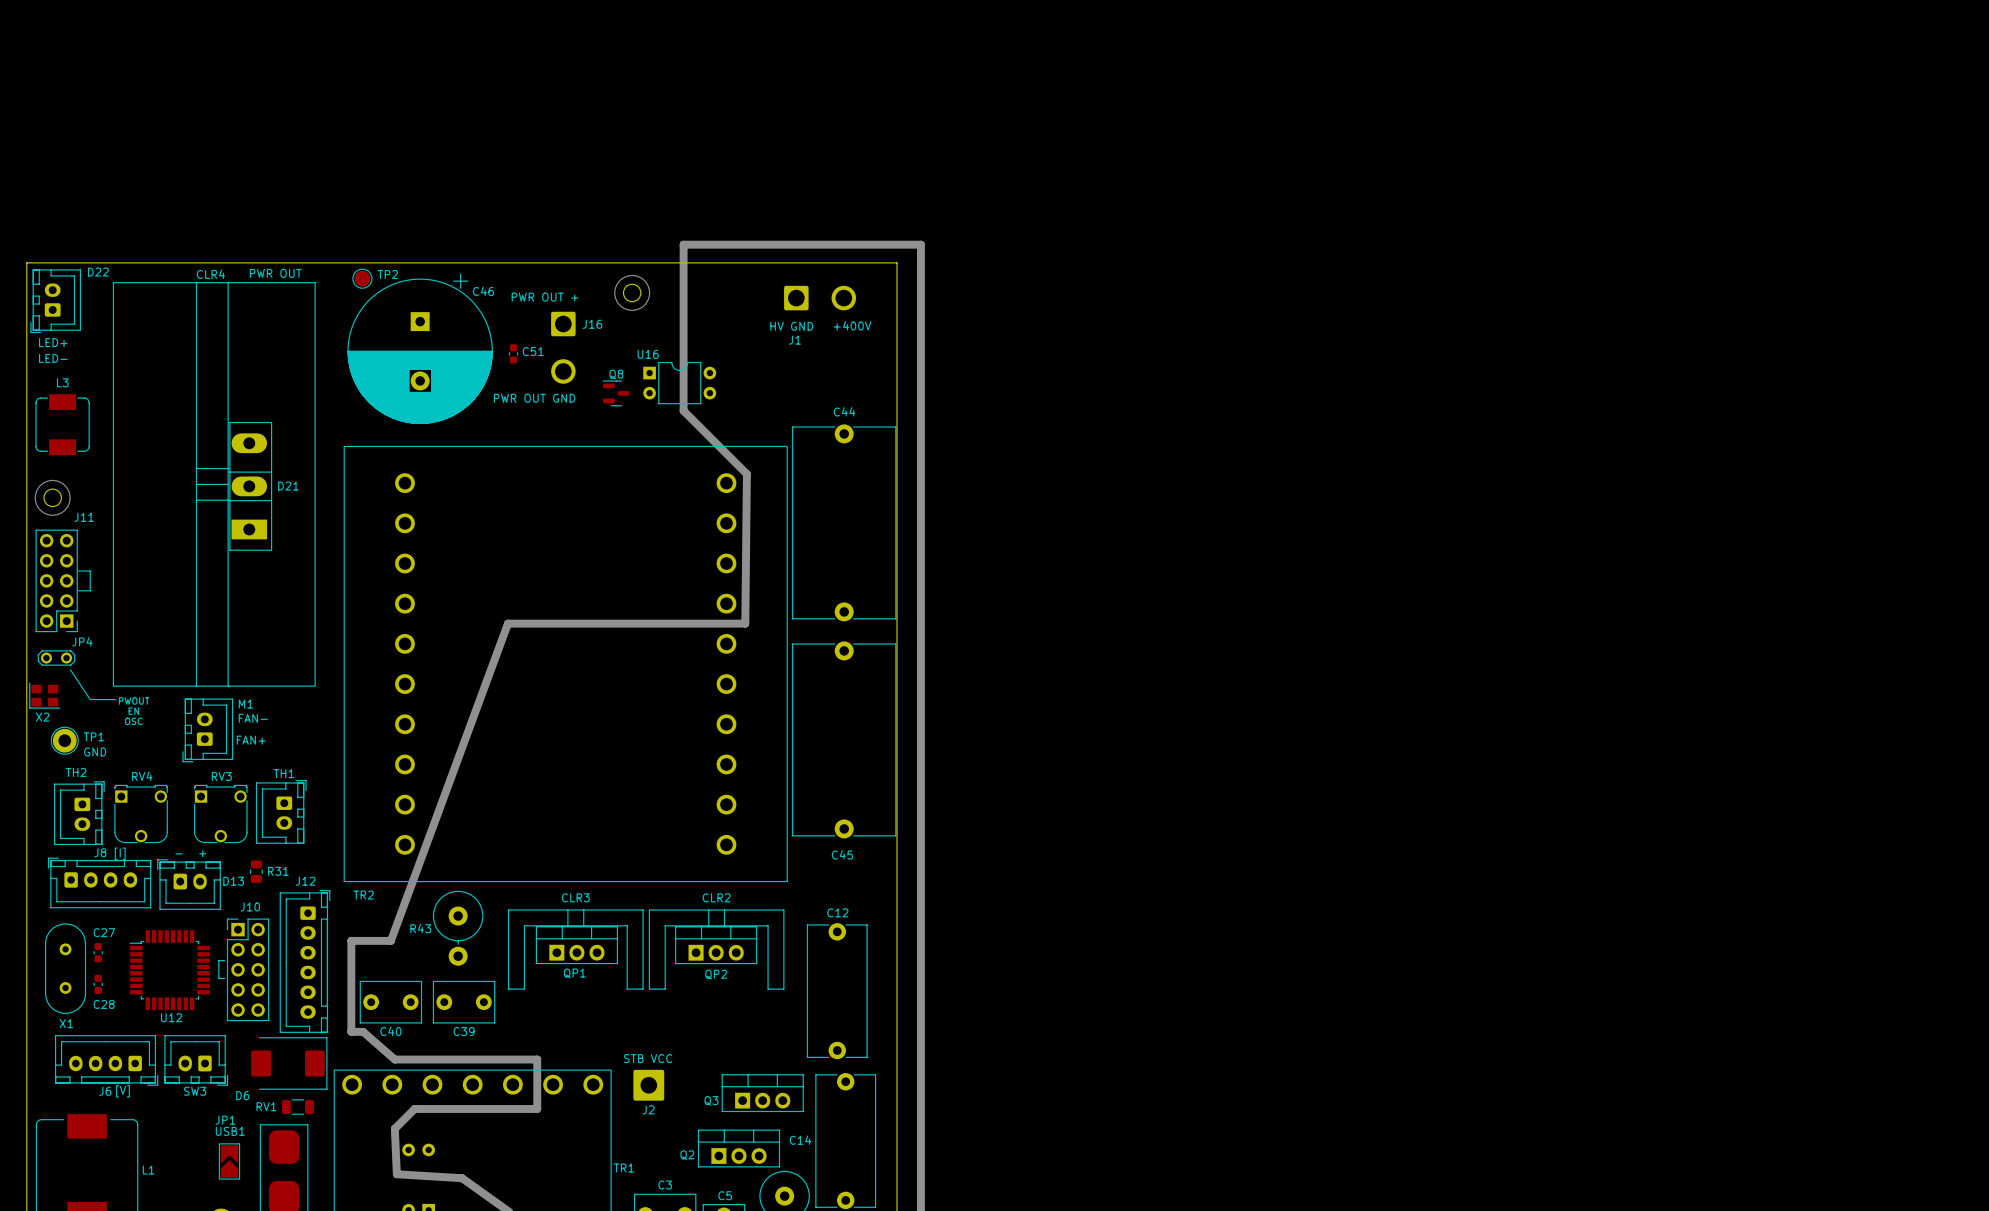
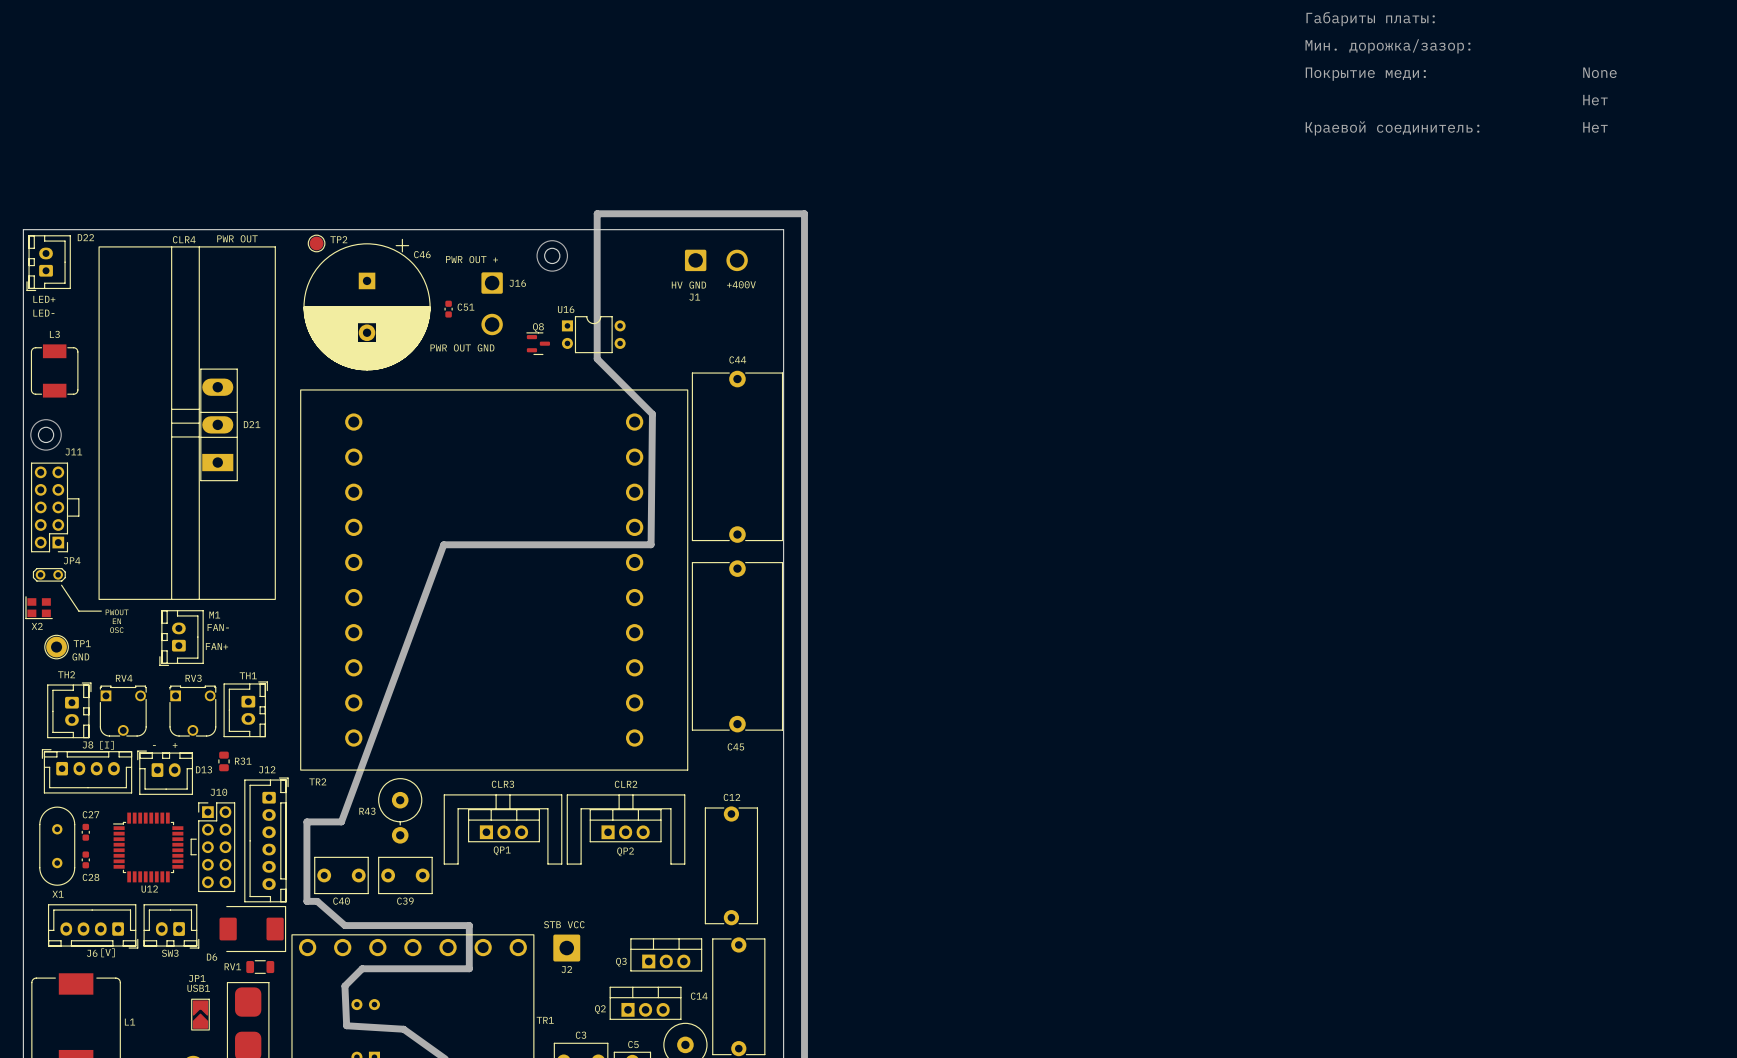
text: none -> Габариты платы: (1370, 19)
text: none -> Мин. дорожка/зазор: (1387, 46)
text: none -> None (1599, 72)
text: none -> Покрытие меди: (1365, 74)
text: none -> Нет (1595, 100)
text: none -> Нет (1595, 127)
text: none -> Краевой соединитель: (1392, 128)

